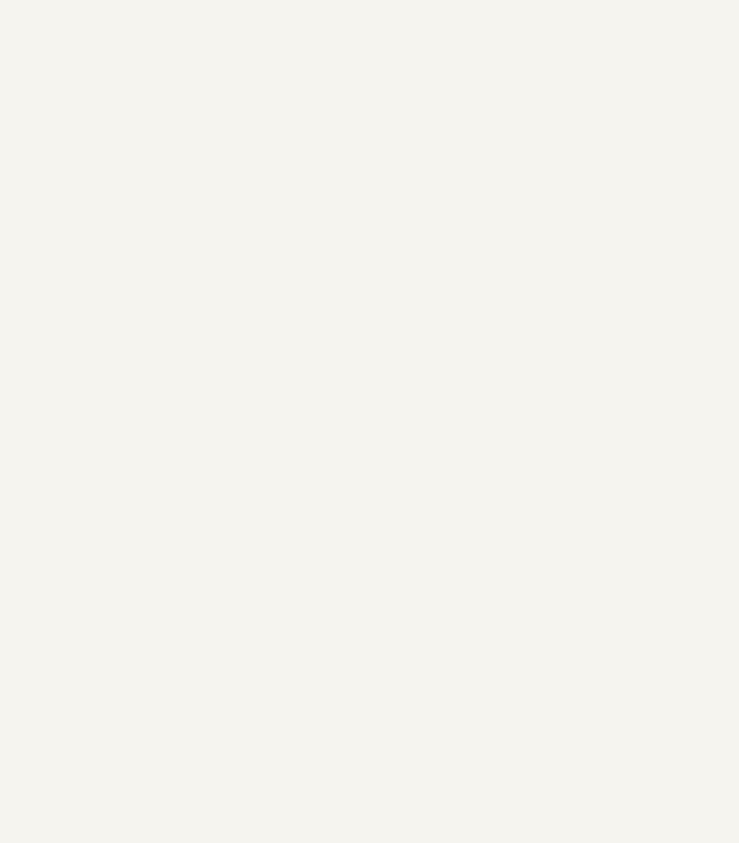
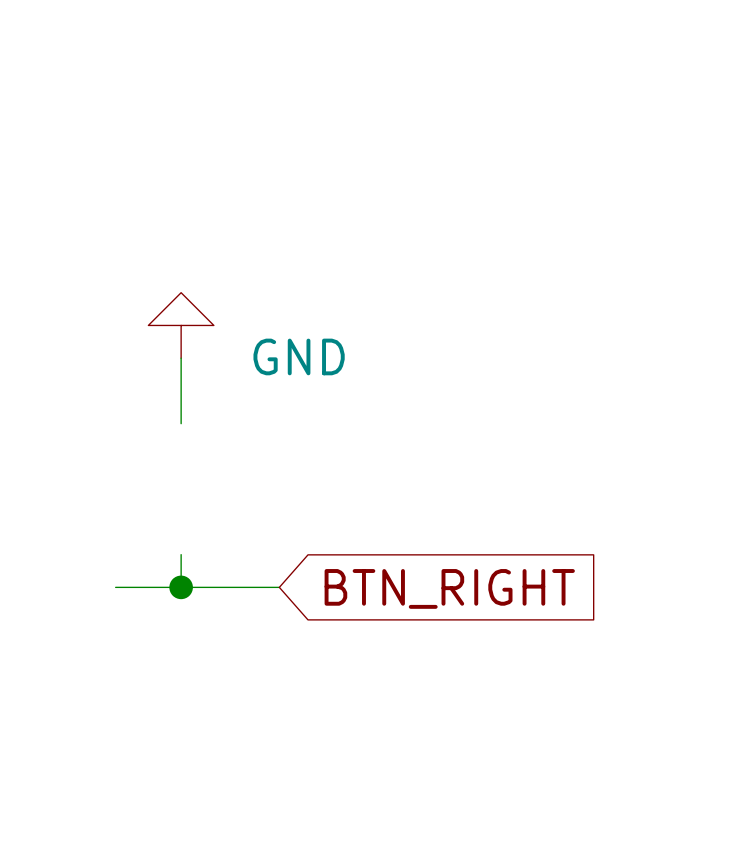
power symbol: none -> GND (181, 325)
wire: none -> (181, 358) (181, 423)
wire: none -> (181, 554) (181, 587)
wire: none -> (115, 587) (279, 587)
junction: none -> (181, 587)
global label: none -> BTN_RIGHT (449, 588)

